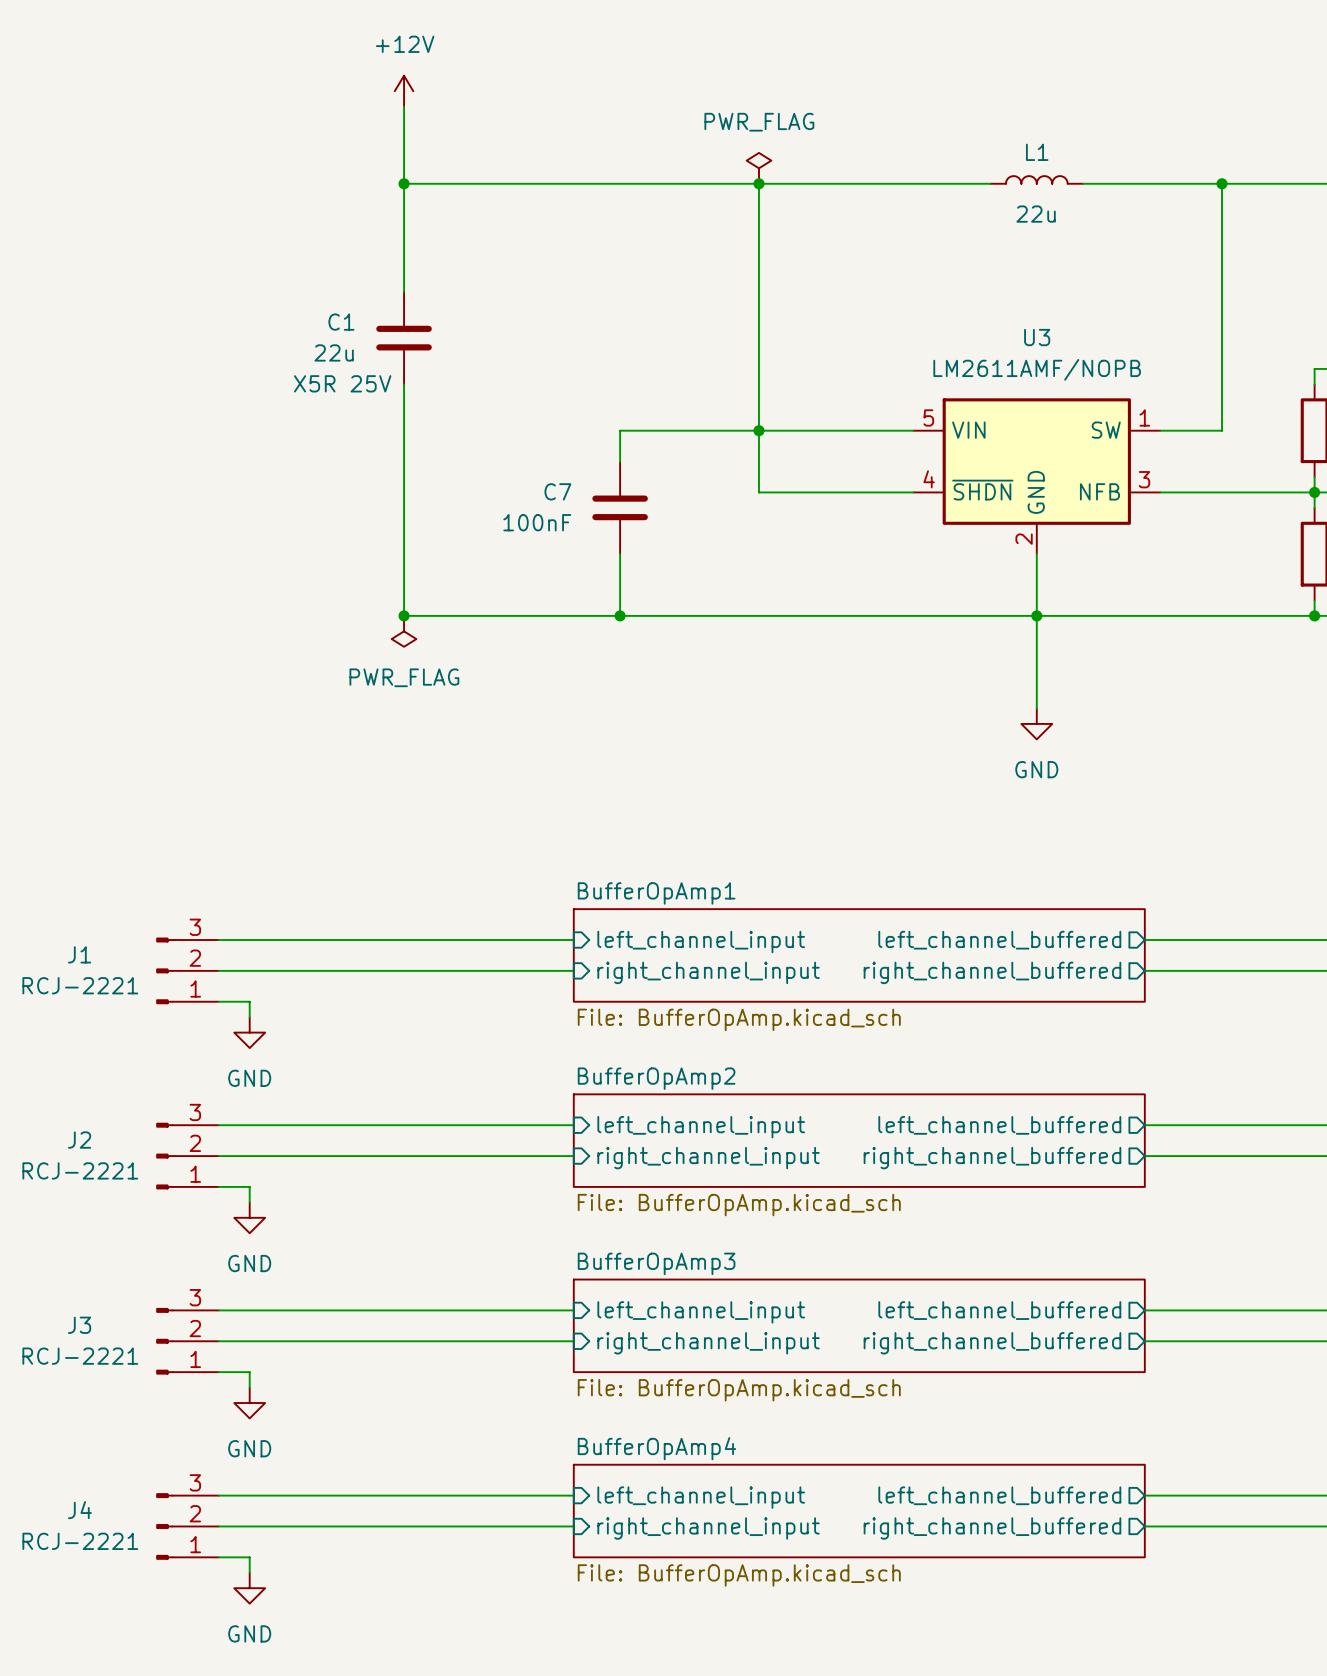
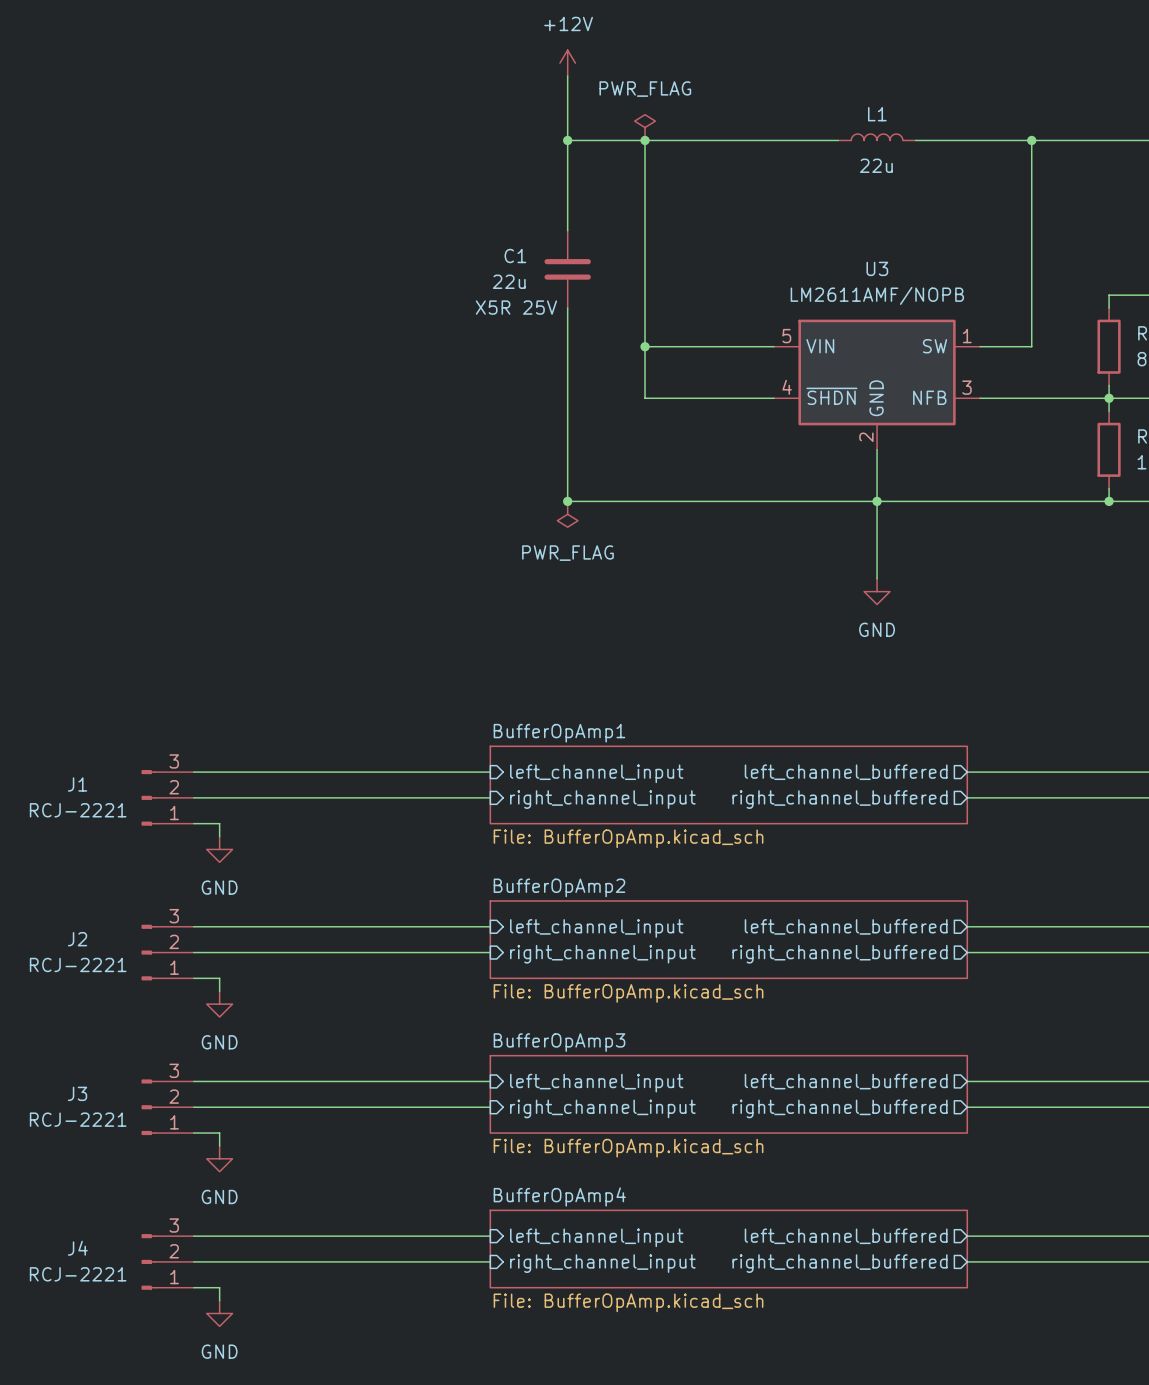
power symbol position: +12V (404, 91) -> +12V (567, 63)
wire: (404, 106) (404, 291) -> (567, 76) (567, 230)
wire: (404, 183) (666, 183) -> none
junction: (404, 183) -> none
junction: none -> (567, 140)
C1 position: (404, 338) -> (567, 269)
wire: (404, 384) (404, 615) (666, 615) -> (567, 308) (567, 501)
wire: (759, 430) (620, 430) (620, 461) -> none
C7: 100nF (620, 507) -> none
wire: (620, 554) (620, 615) -> none
junction: (404, 615) -> none
junction position: (620, 615) -> (567, 501)
power symbol position: PWR_FLAG (404, 631) -> PWR_FLAG (567, 514)

